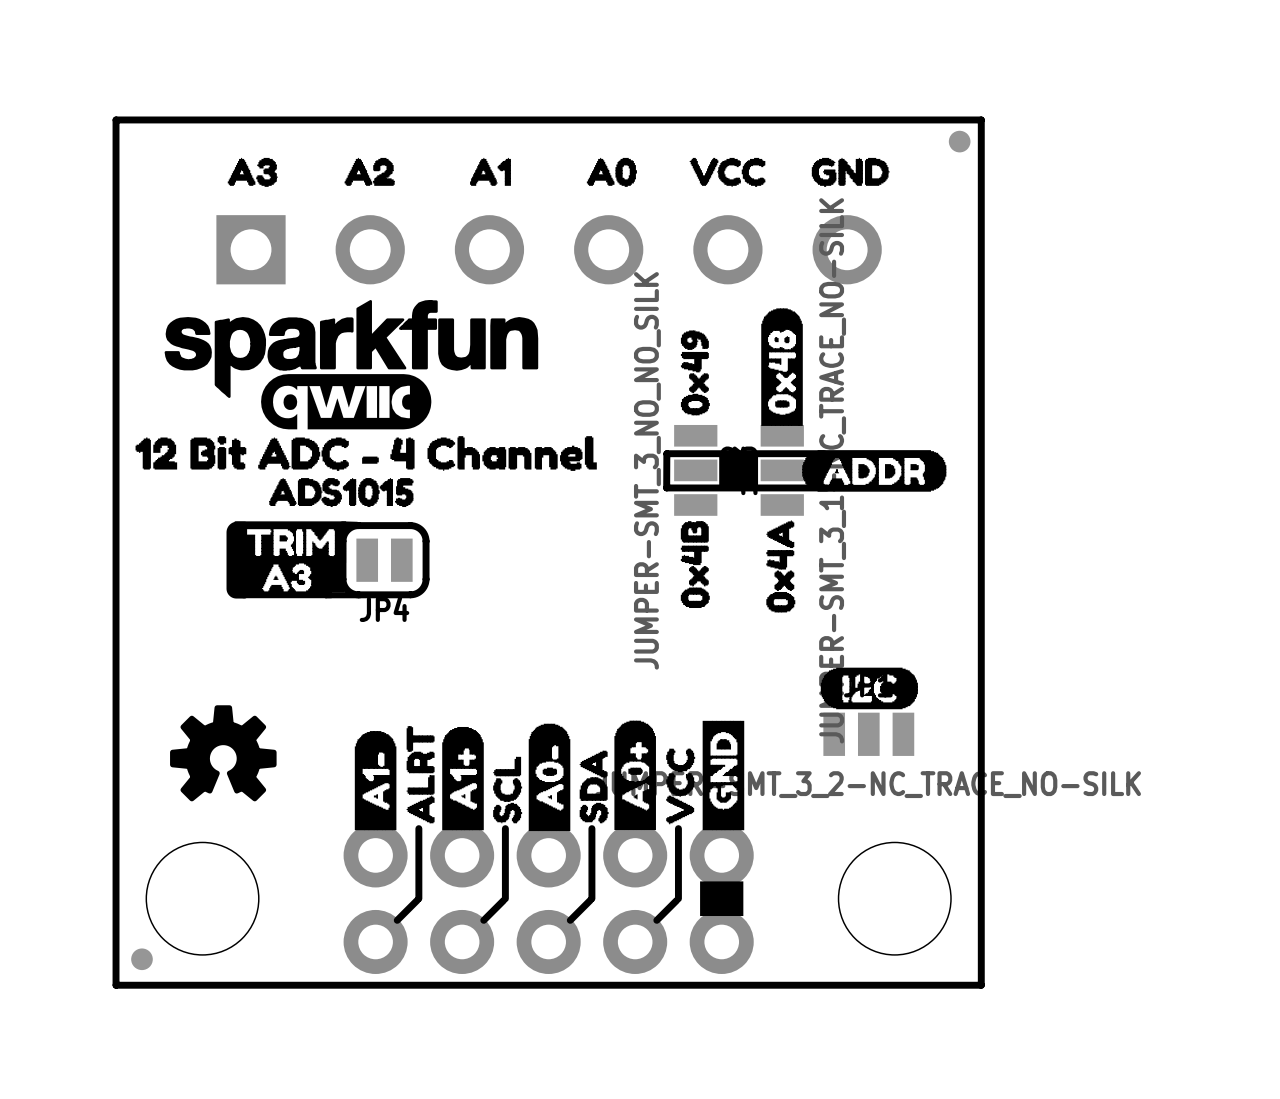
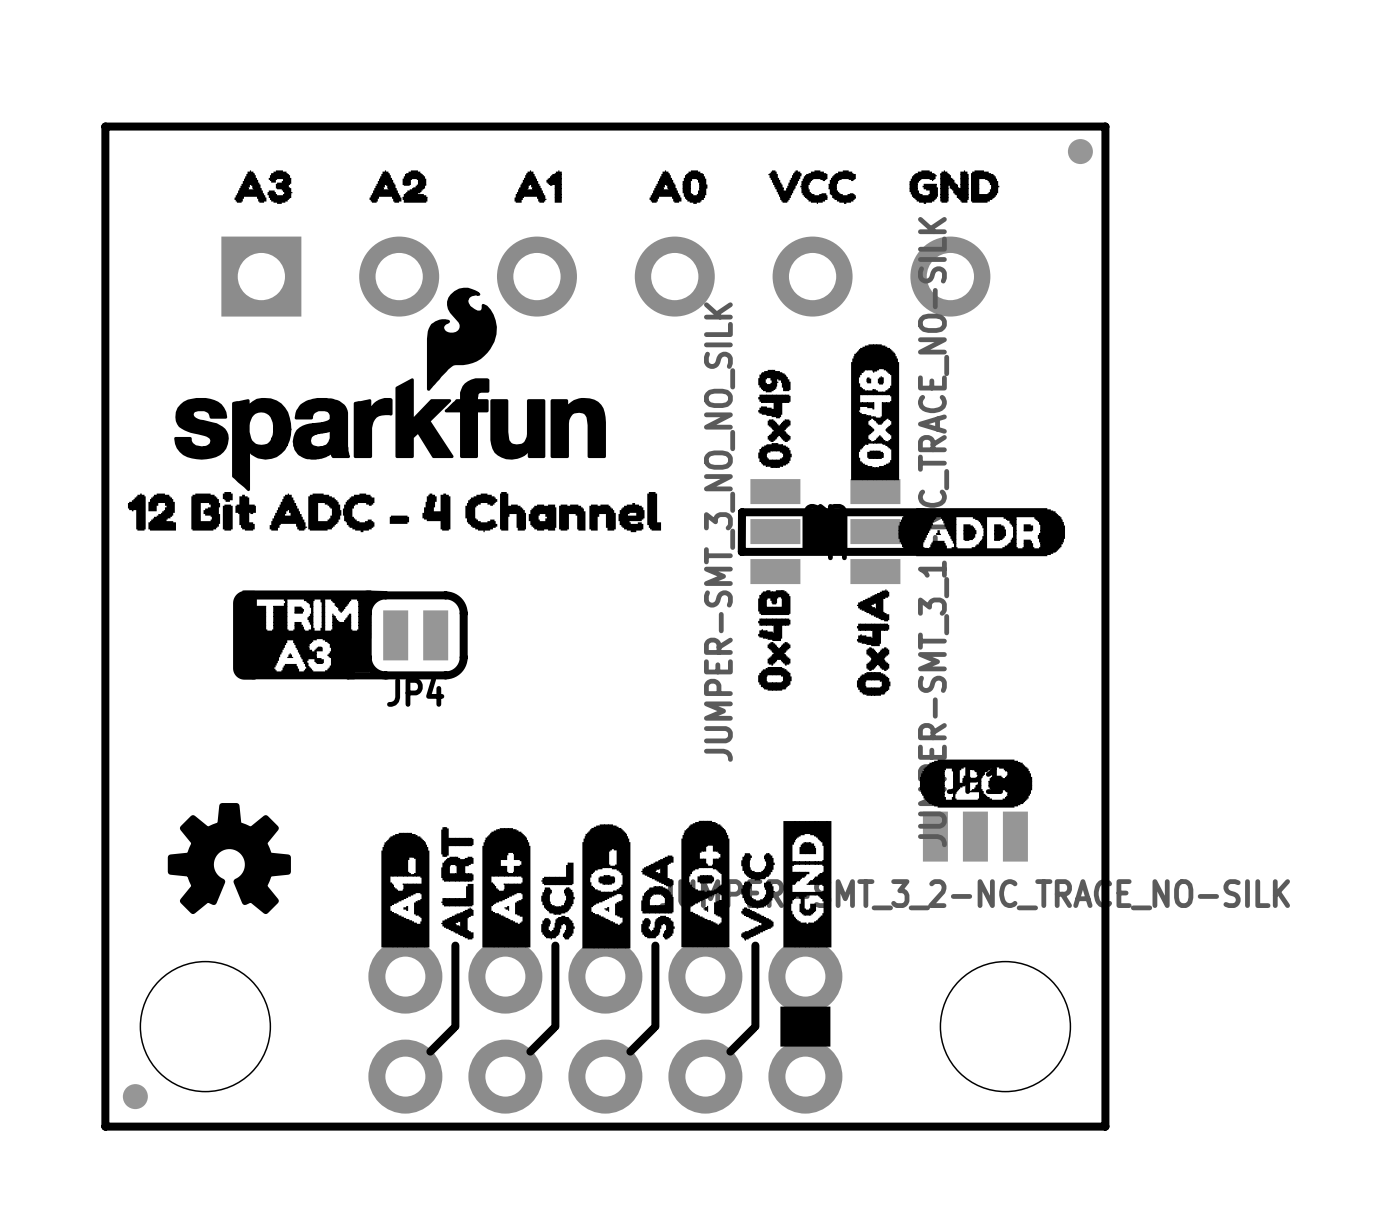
drawing shape: [164, 300, 539, 398] -> [174, 287, 606, 492]
drawing: [261, 374, 432, 430] -> none
drawing: [269, 478, 414, 508] -> none

